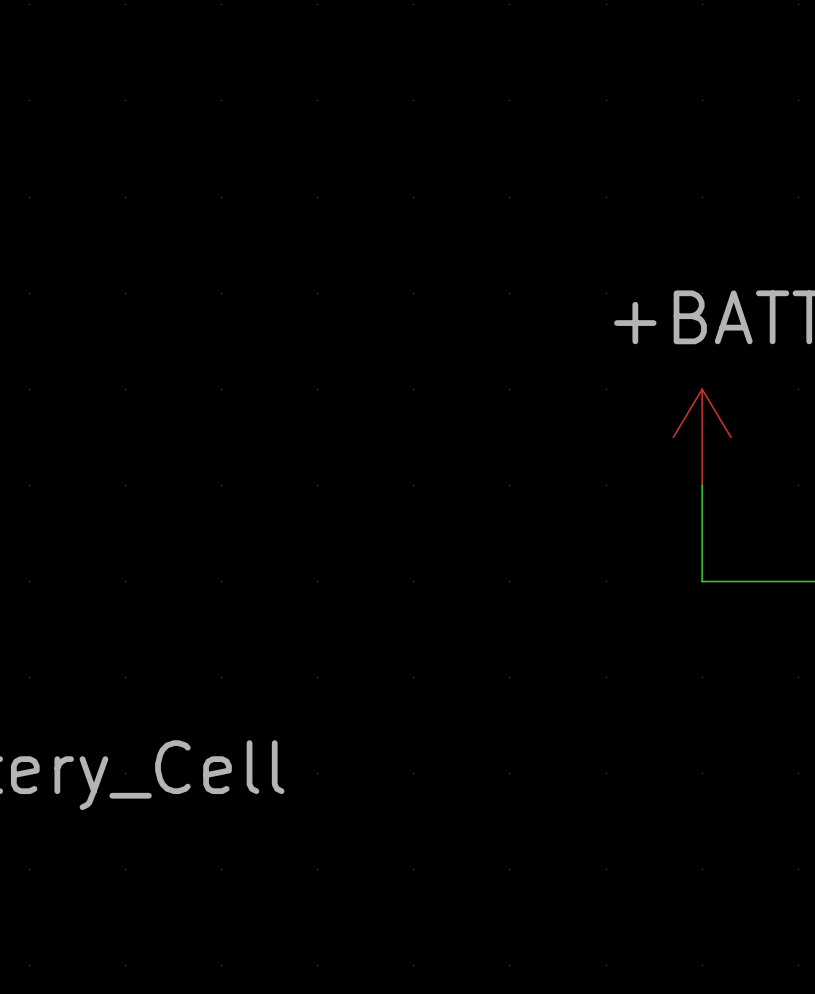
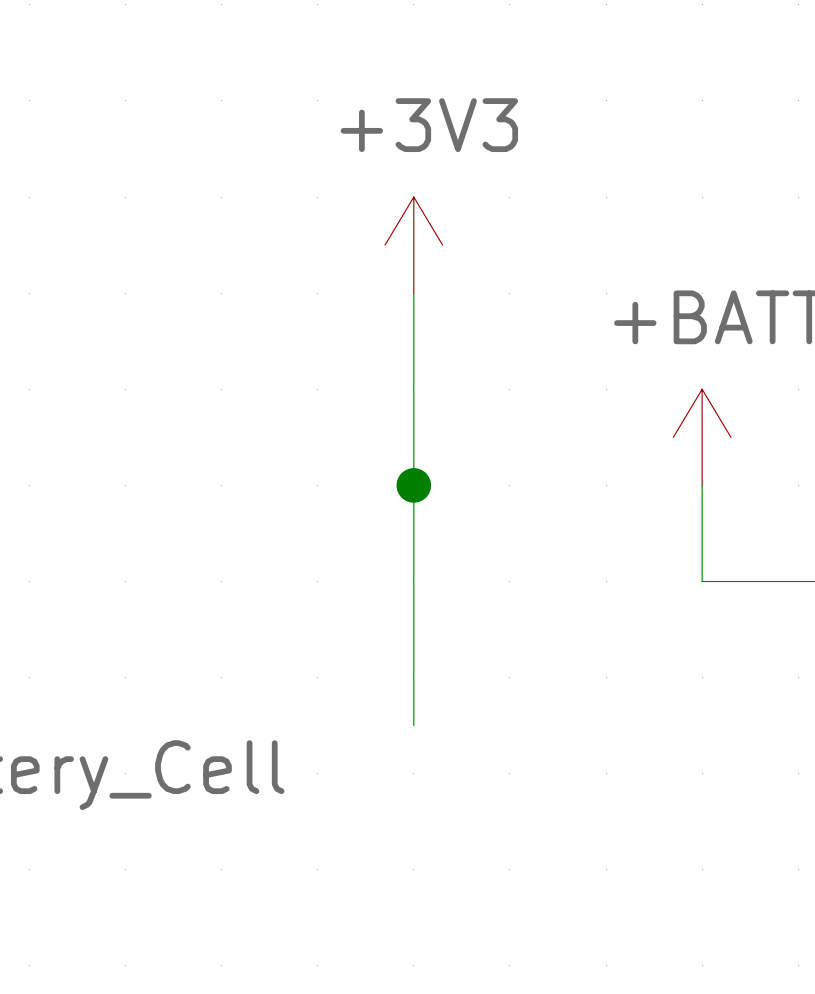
power symbol: none -> +3V3 (413, 245)
wire: none -> (413, 293) (413, 725)
junction: none -> (413, 485)

